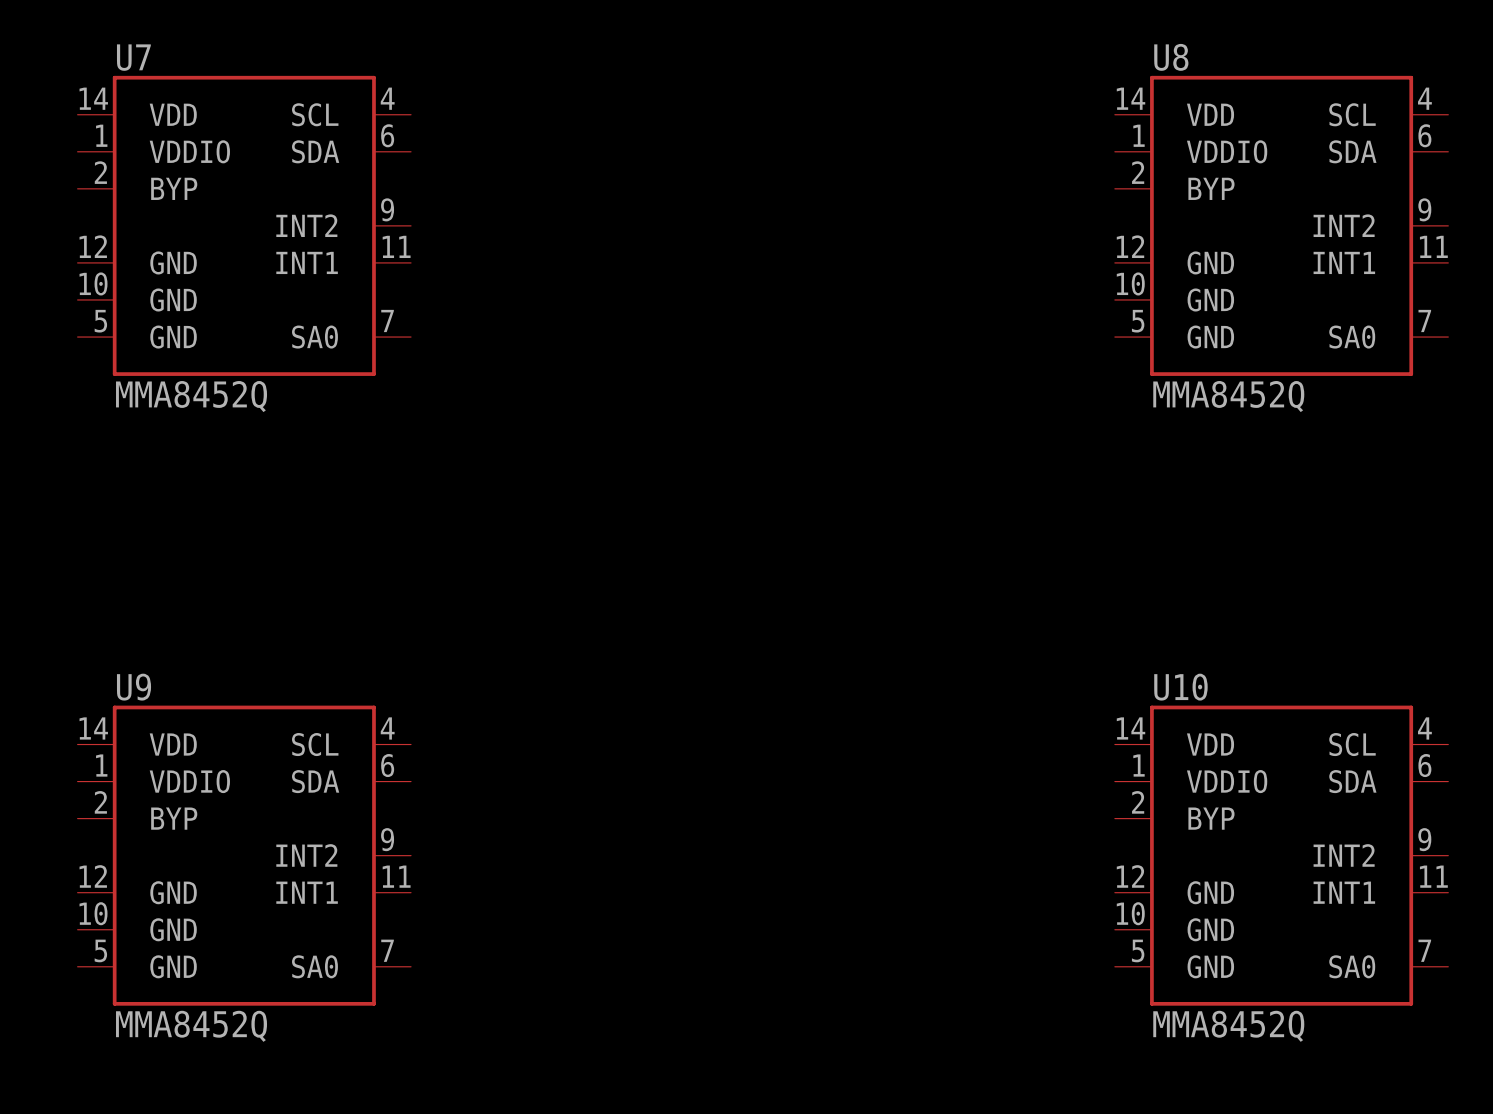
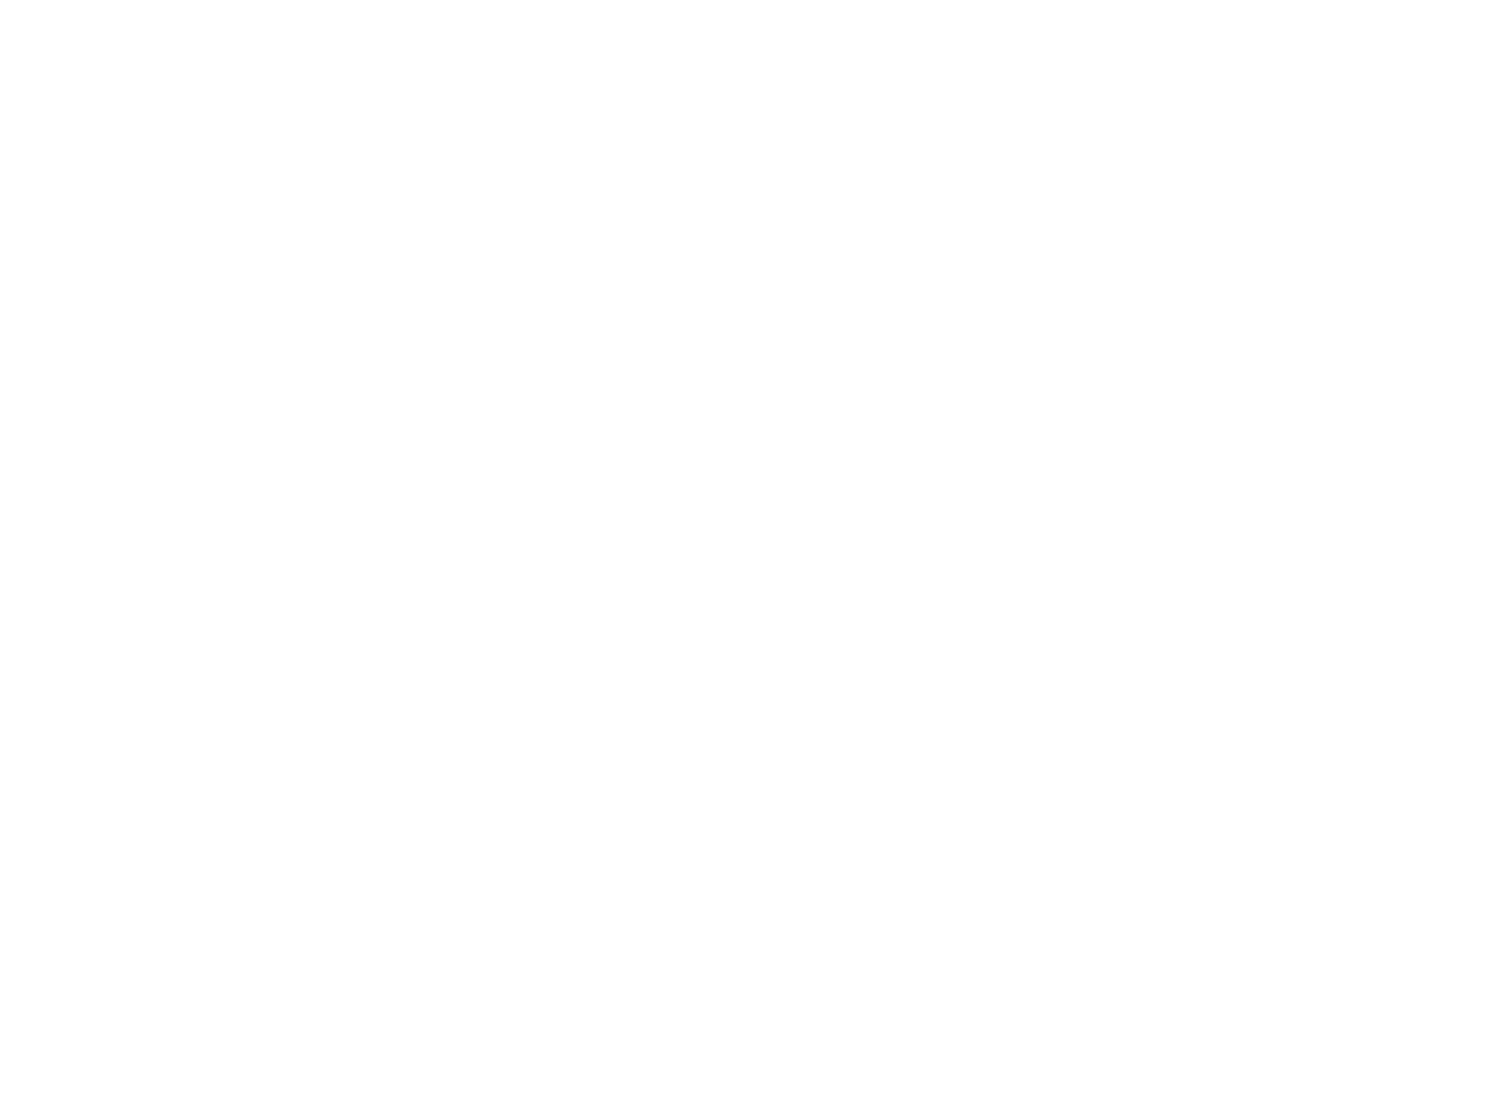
U7: MMA8452Q (244, 225) -> none
U8: MMA8452Q (1281, 225) -> none
U9: MMA8452Q (244, 855) -> none
U10: MMA8452Q (1281, 855) -> none

